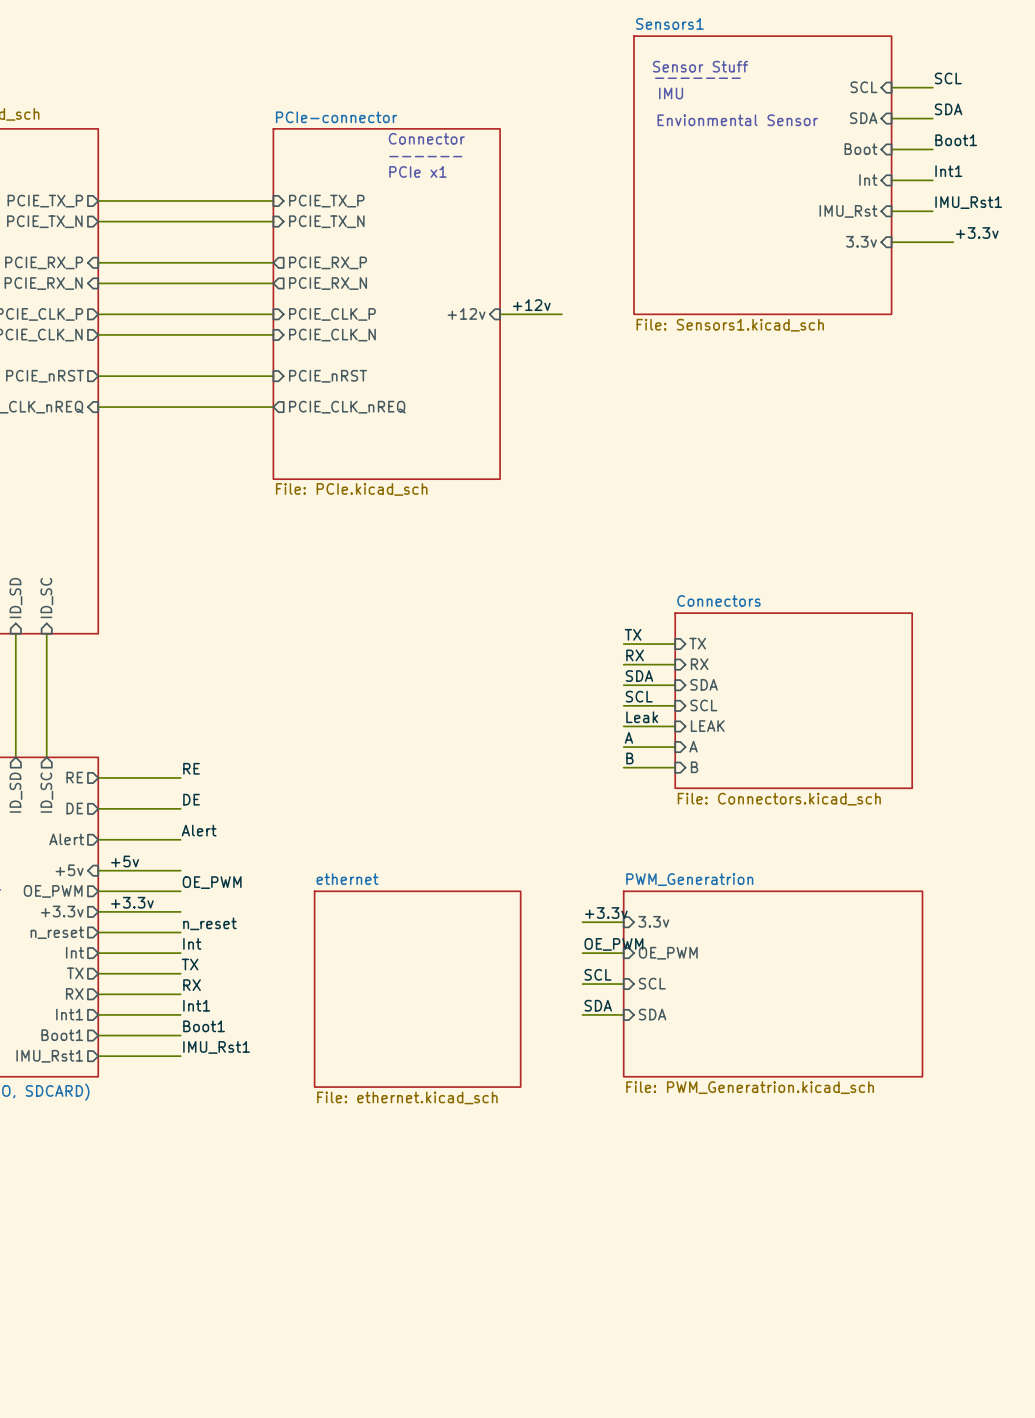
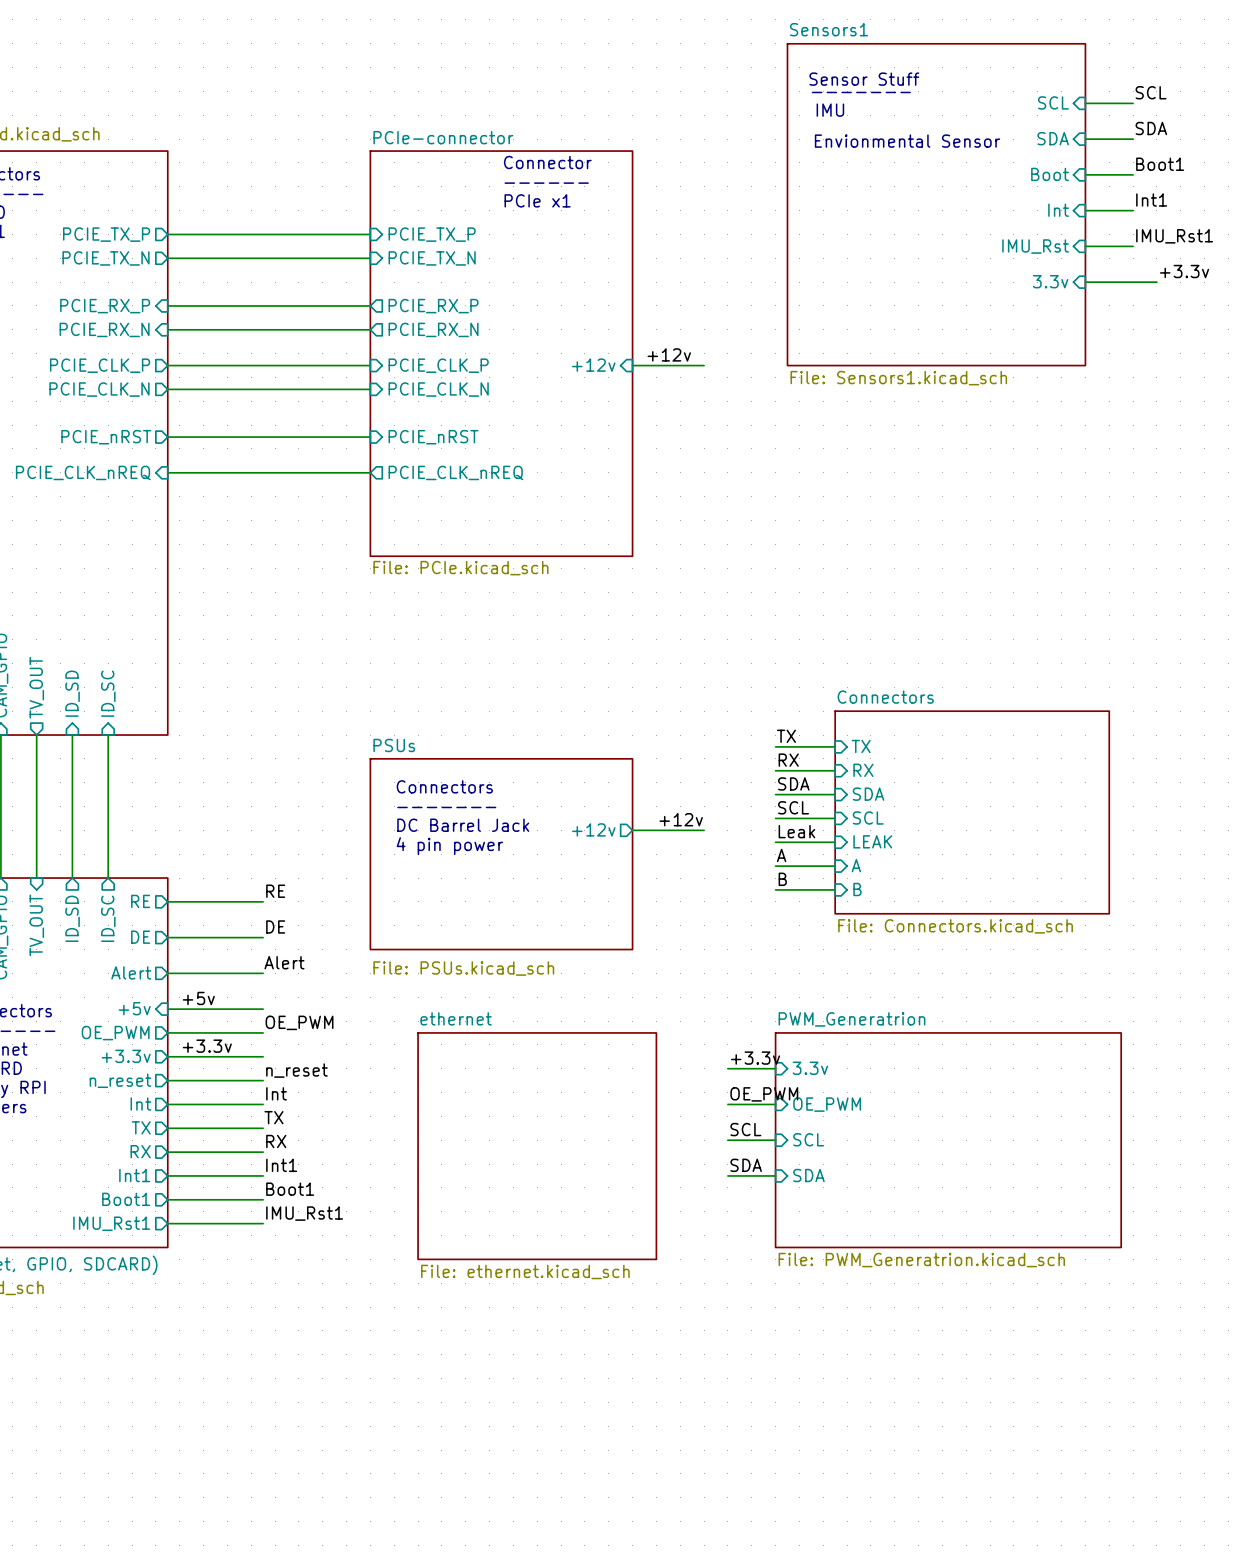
text: none -> Connectors (444, 786)
text: none -> ------- (446, 807)
label: none -> +12v (681, 819)
text: none -> DC Barrel Jack (463, 825)
sheet pin: none -> +12v (593, 829)
wire: none -> (632, 830) (704, 830)
text: none -> 4 pin power (449, 846)
sheet PSUs: none -> File: PSUs.kicad_sch (501, 854)

